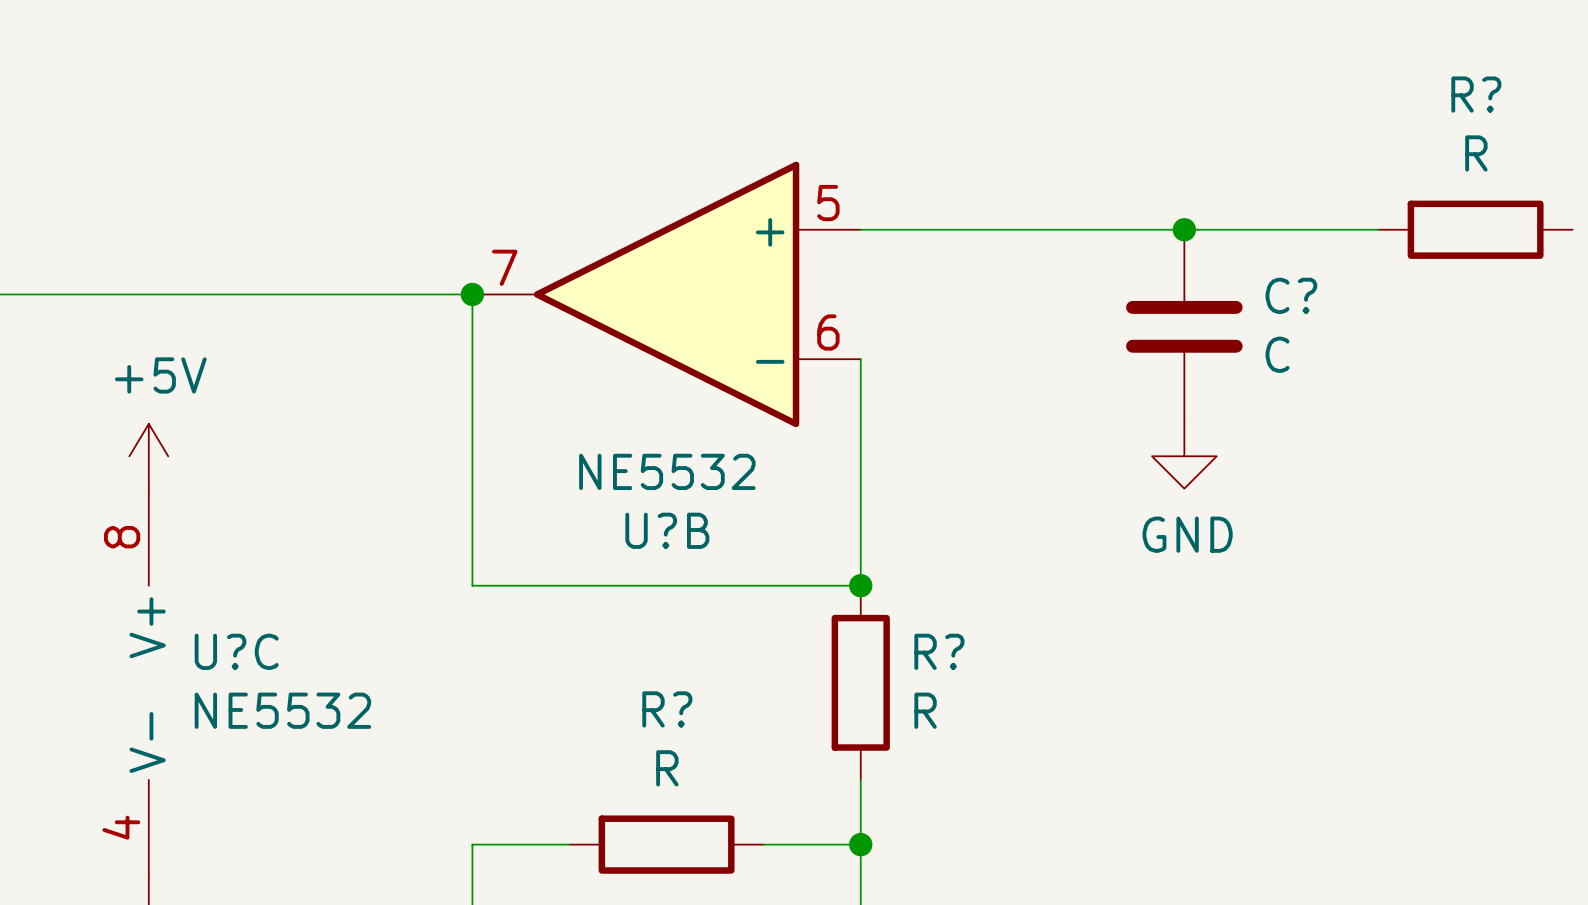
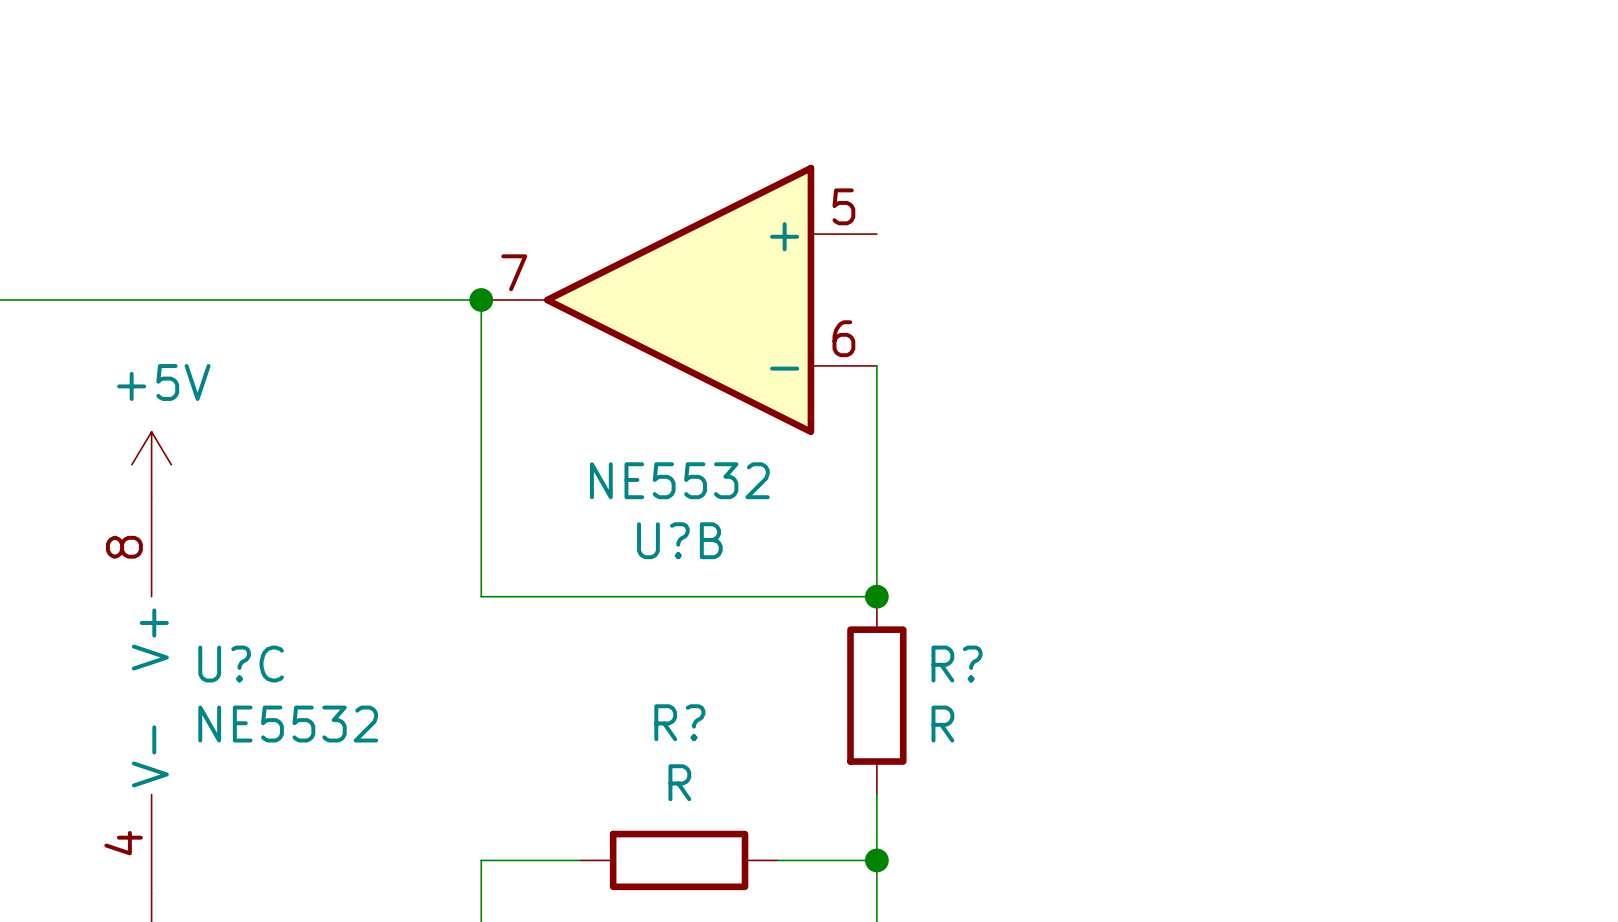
wire: (860, 229) (1378, 229) -> none
junction: (1184, 229) -> none
R?: R (1475, 229) -> none
C?: C (1184, 326) -> none
power symbol: GND (1184, 456) -> none

